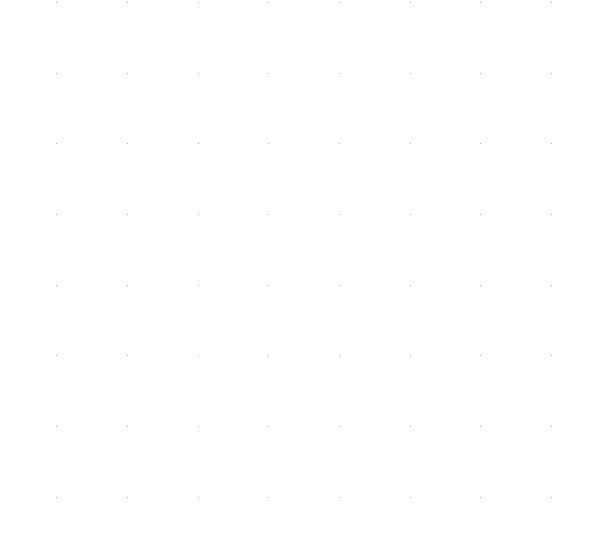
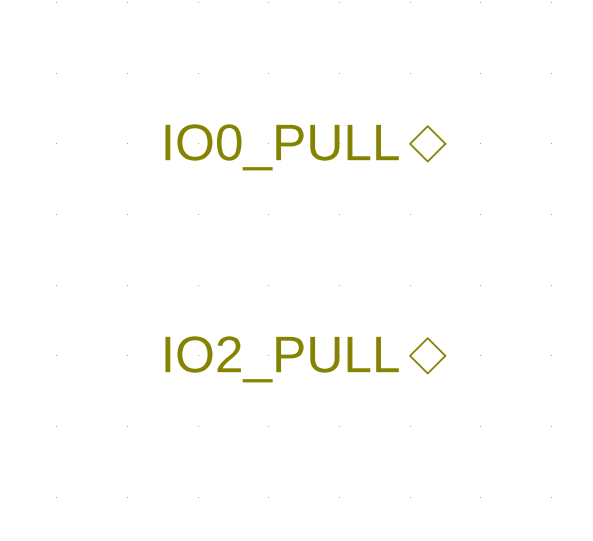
hierarchical label: none -> IO0_PULL (282, 147)
hierarchical label: none -> IO2_PULL (282, 359)

